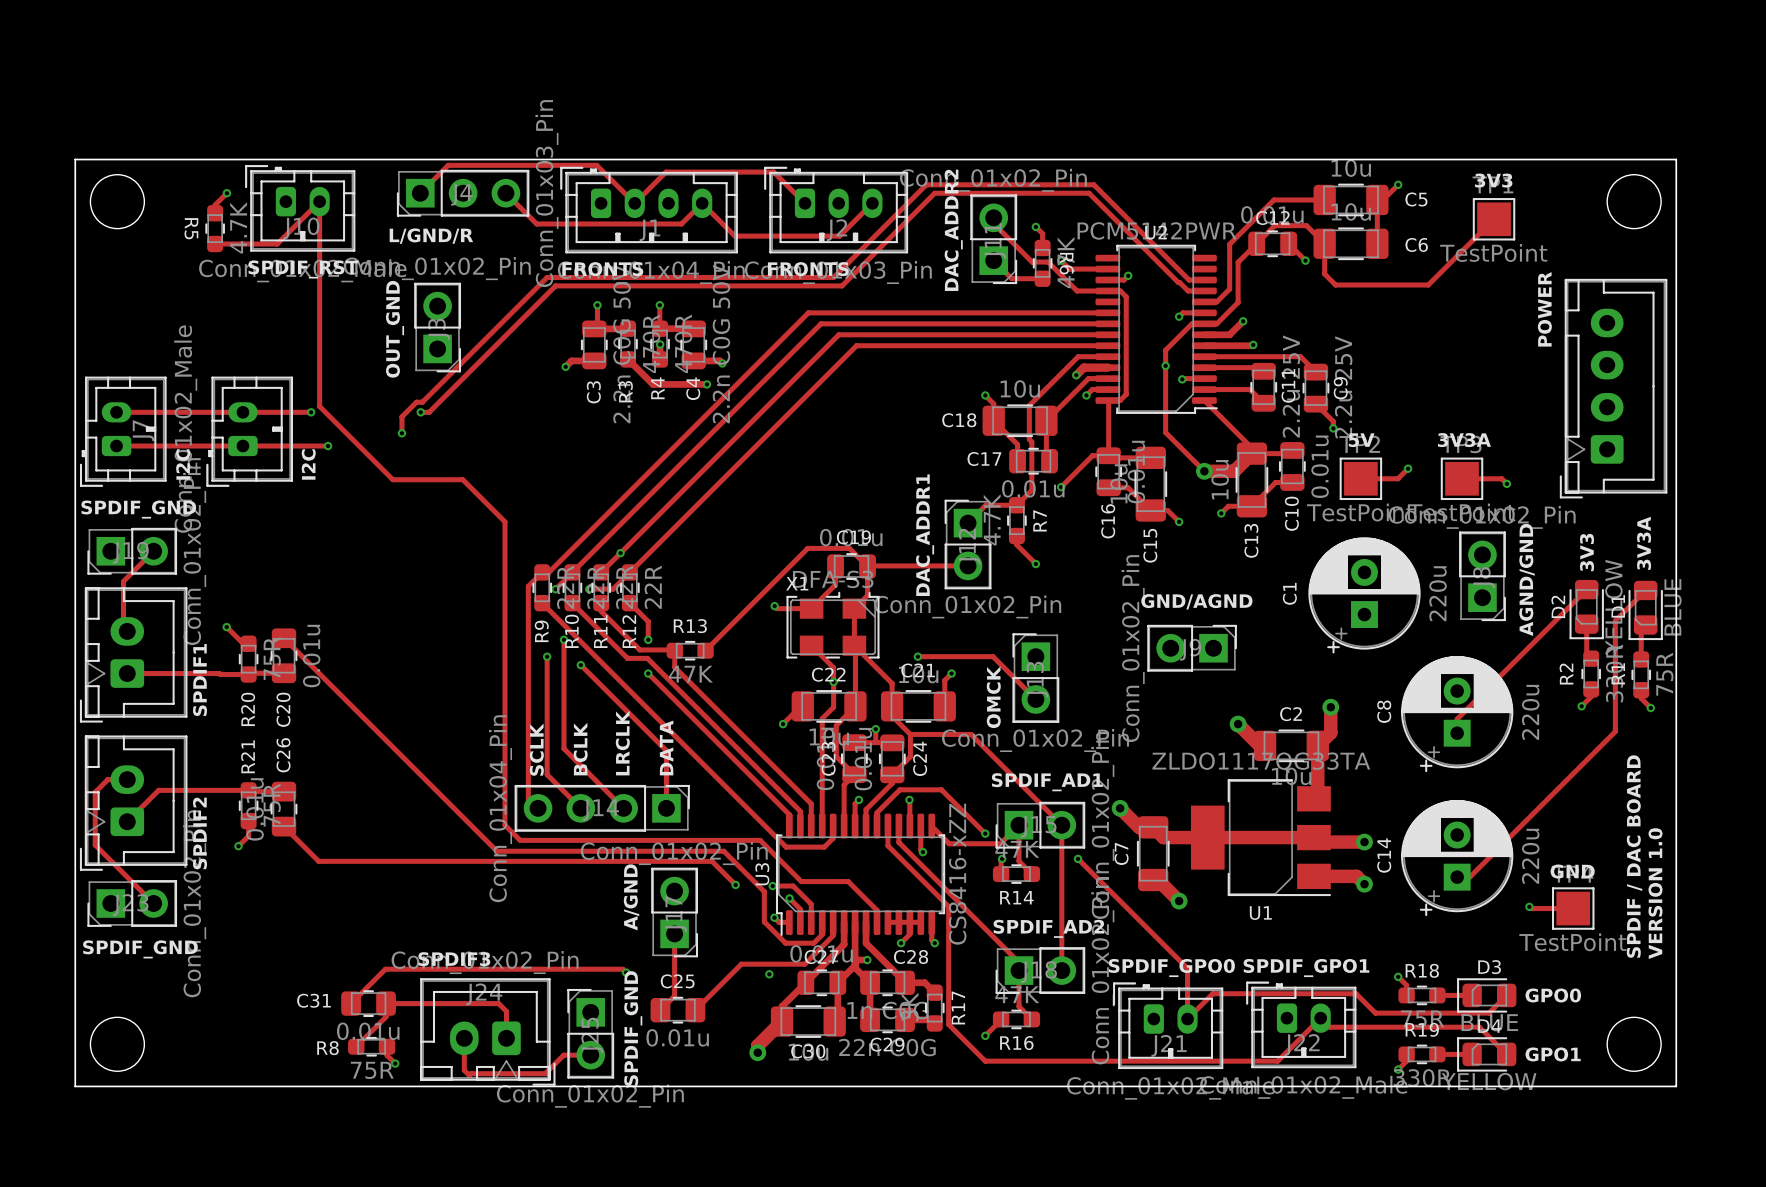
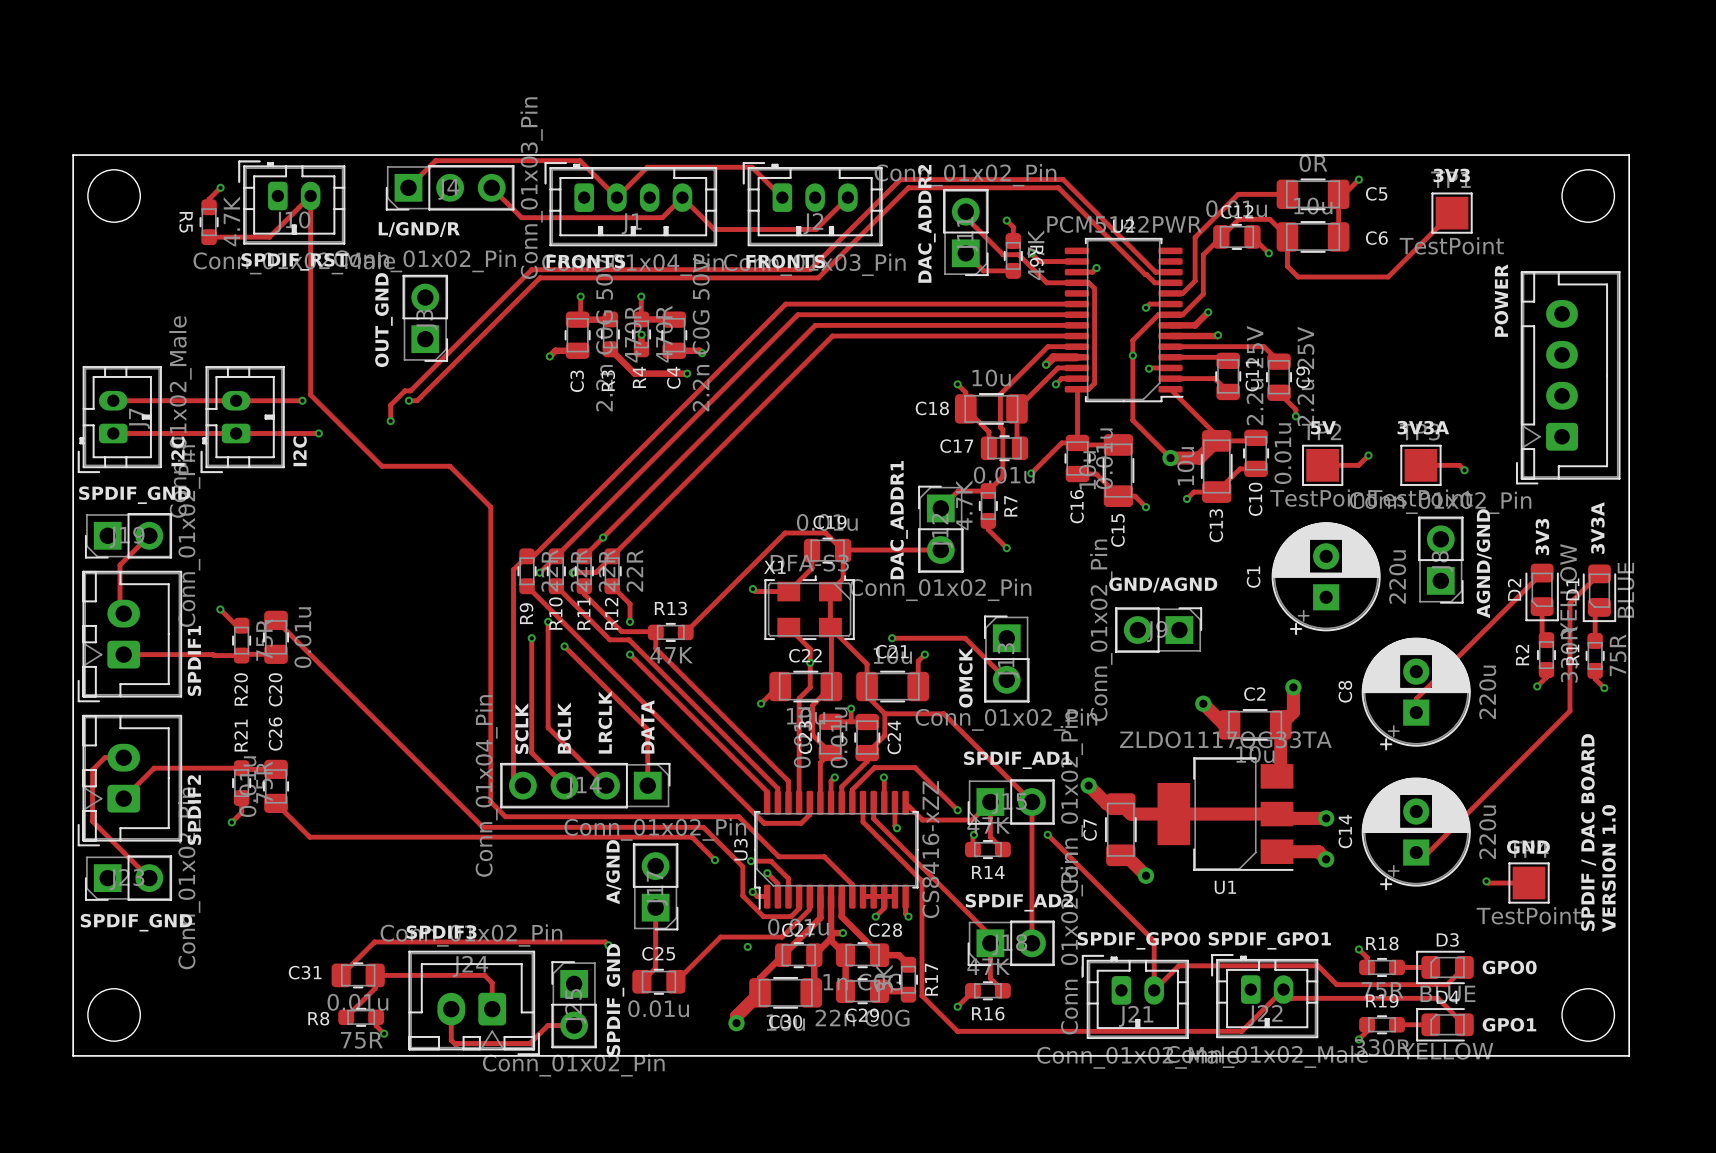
C5 value: 10u (1351, 168) -> 0R (1313, 163)

